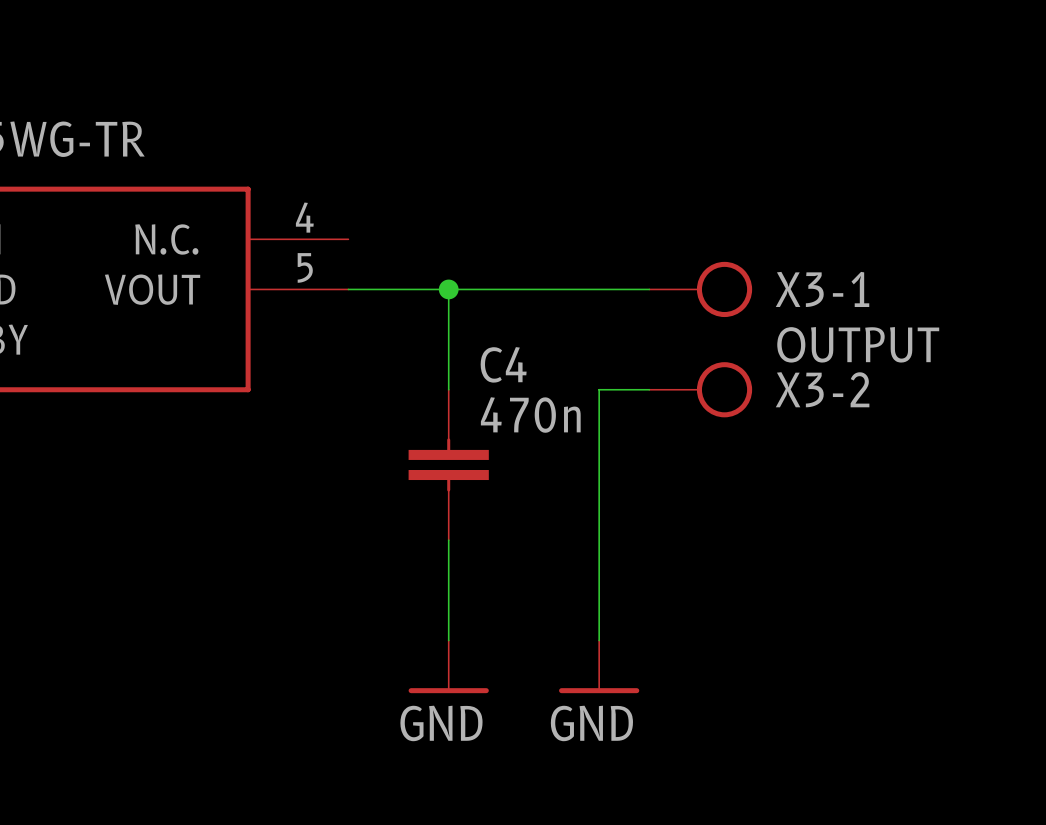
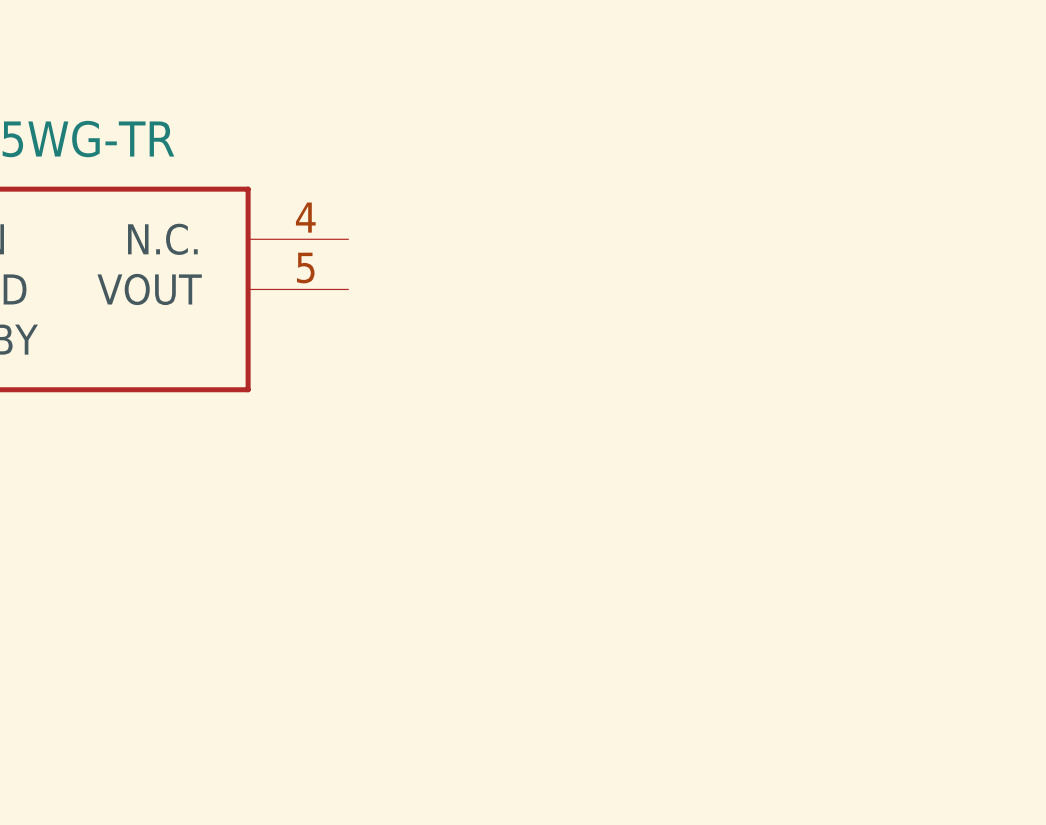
wire: (348, 289) (649, 289) -> none
wire: (448, 289) (448, 389) -> none
junction: (448, 289) -> none
X3-1: (700, 289) -> none
wire: (649, 389) (599, 389) (599, 640) -> none
X3-2: OUTPUT (700, 389) -> none
C4: 470n (448, 464) -> none
wire: (448, 540) (448, 640) -> none
power symbol: GND (448, 666) -> none
power symbol: GND (599, 666) -> none

